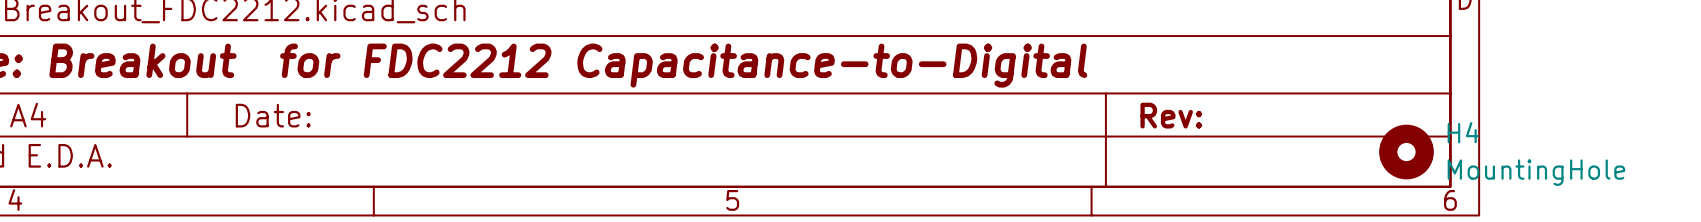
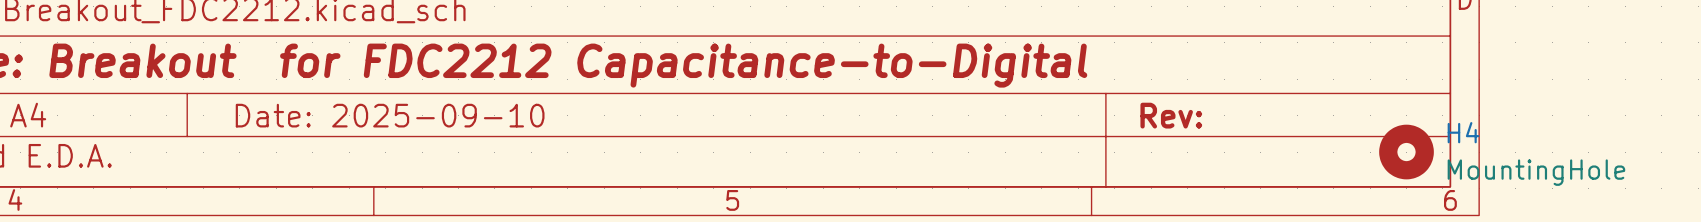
title block: Date: (273, 115) -> Date: 2025-09-10 (390, 115)

